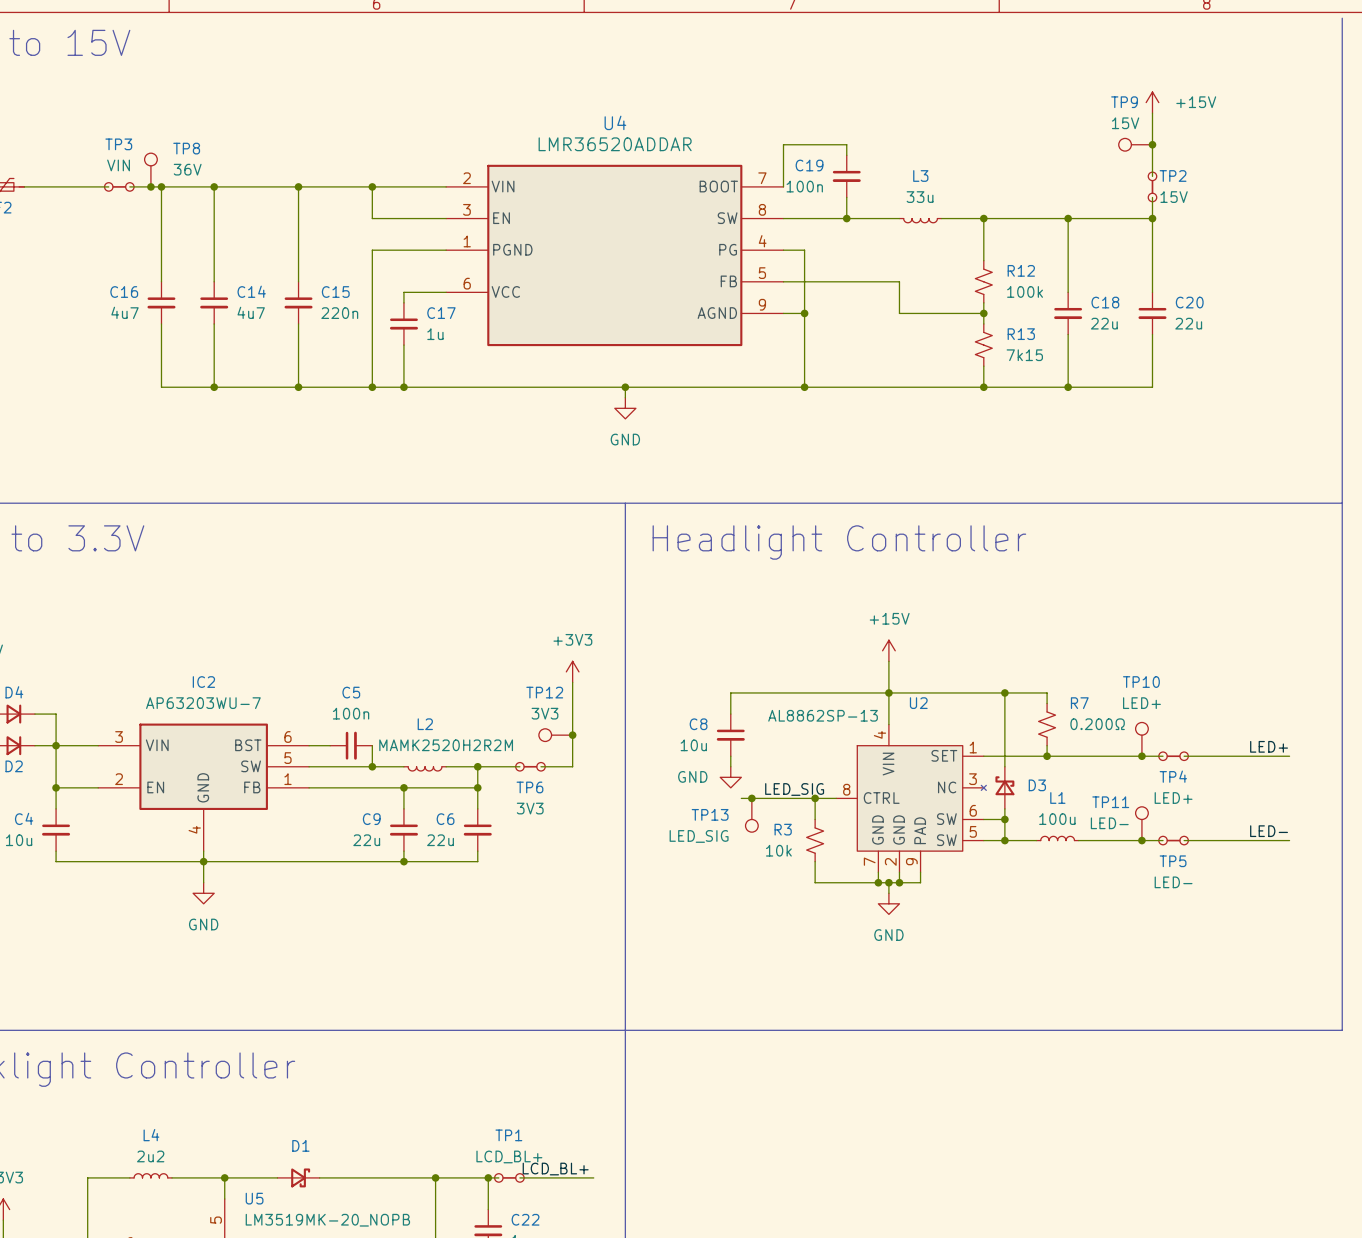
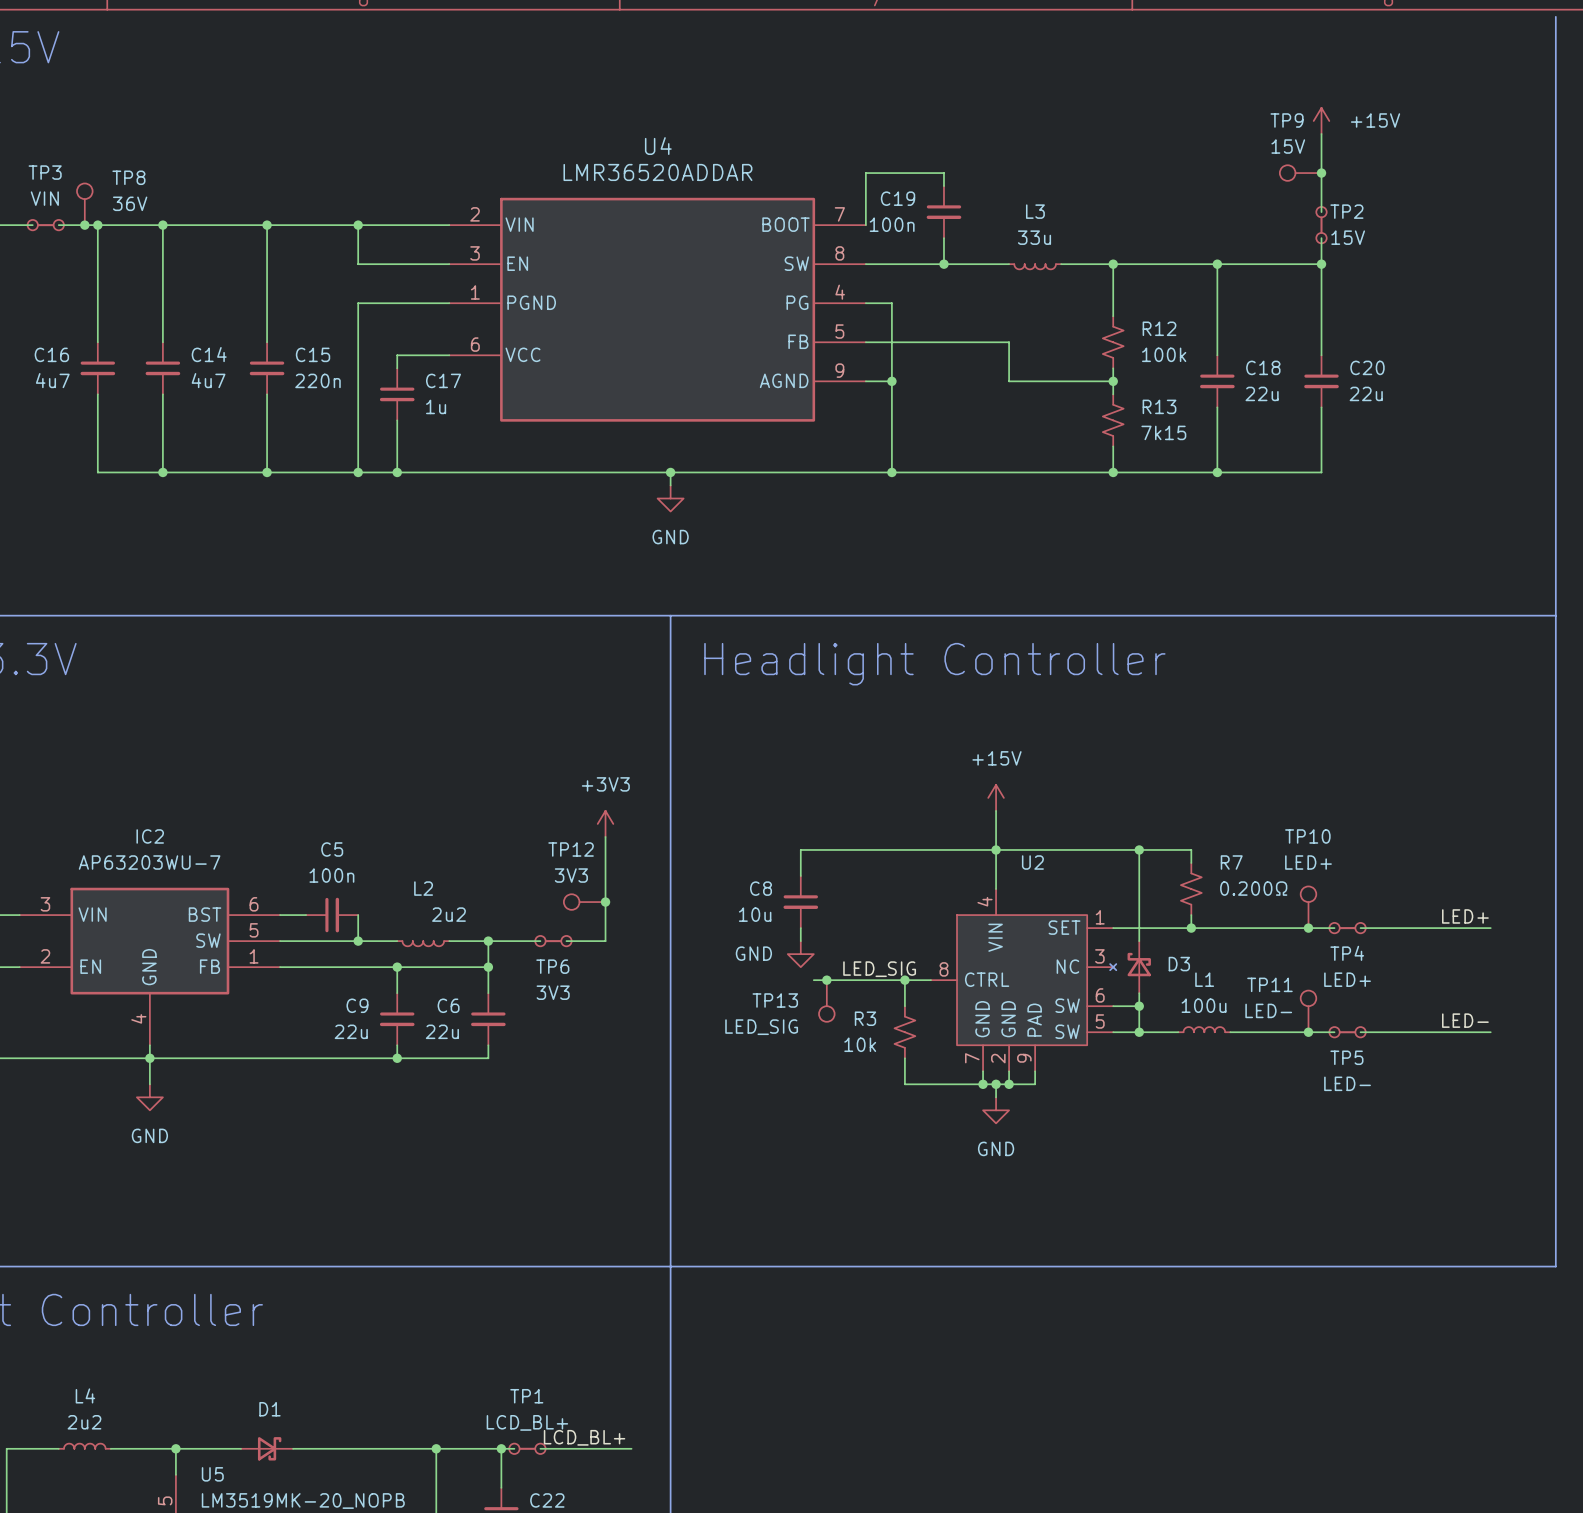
U2 text: AL8862SP-13 (823, 715) -> none
L2 value: MAMK2520H2R2M (446, 745) -> 2u2 (449, 914)

